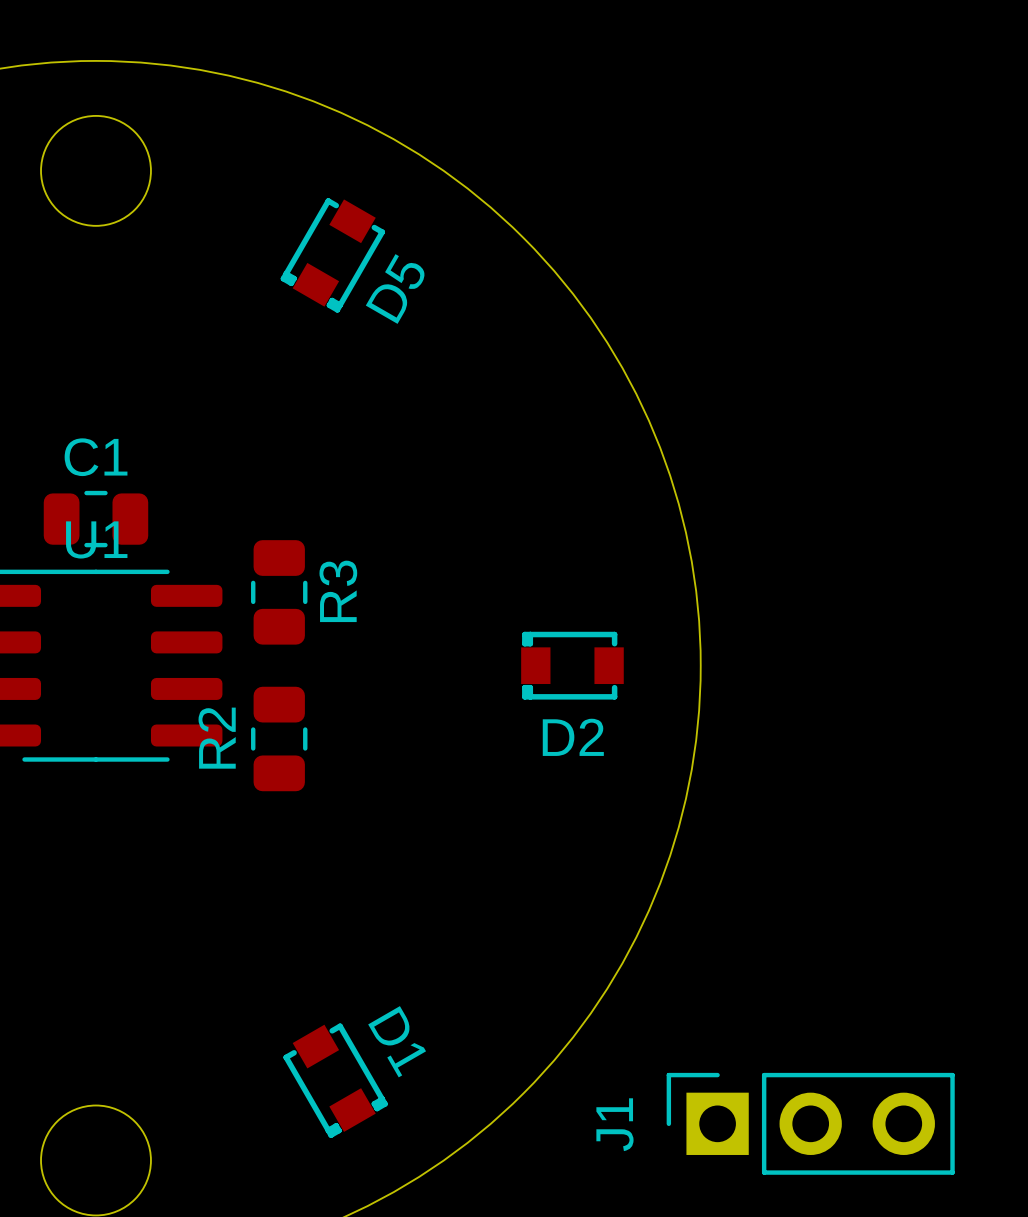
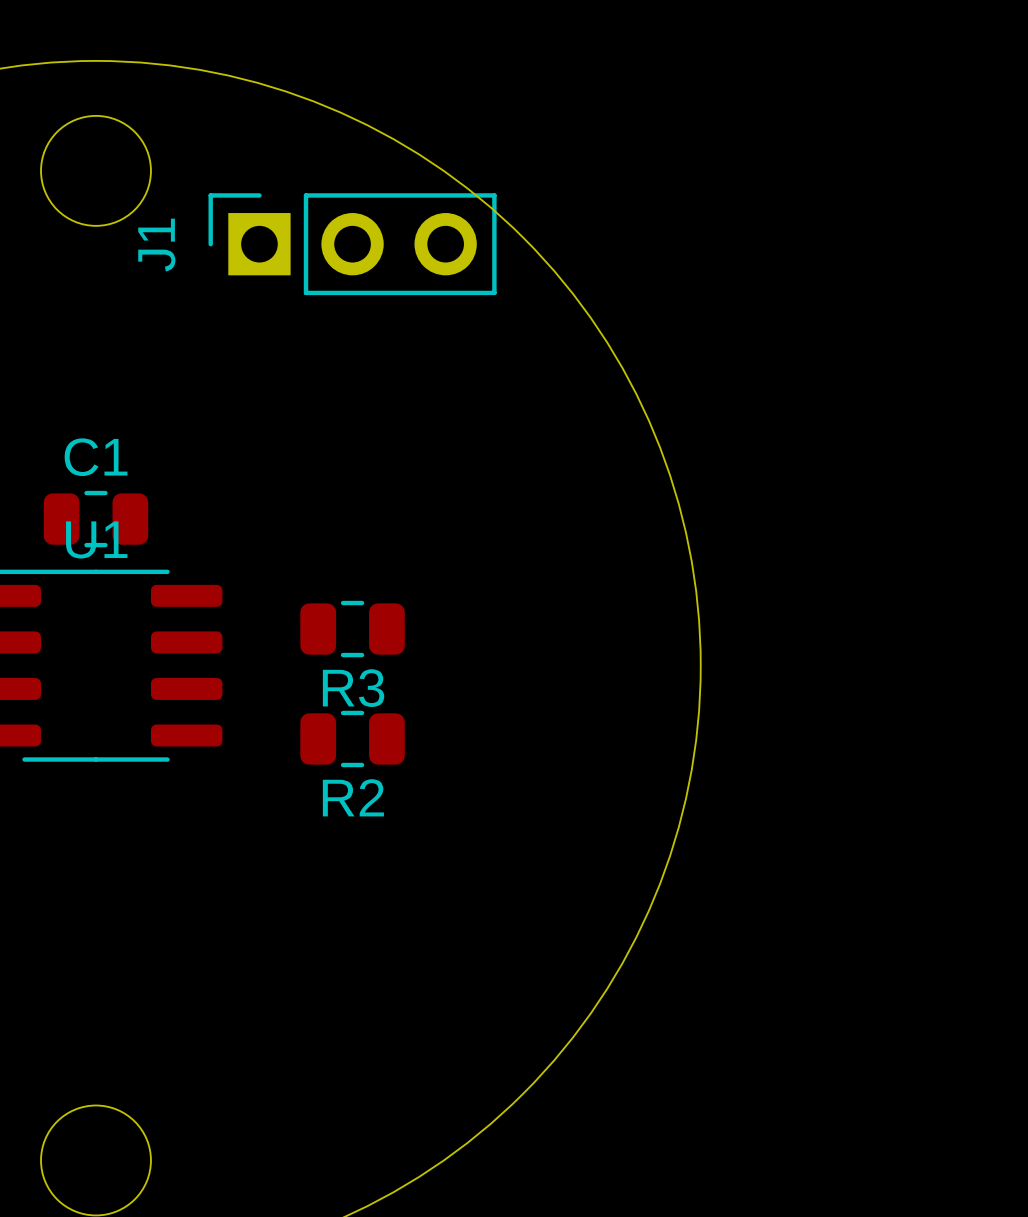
D5: (332, 255) -> none
R3 rotation: 0° (279, 592) -> 90° clockwise (352, 629)
R3 position: (279, 592) -> (352, 629)
D2: (572, 665) -> none
R2 name position: R2 (217, 738) -> R2 (353, 797)
R2 rotation: 0° (279, 738) -> 90° clockwise (352, 738)
R2 position: (279, 738) -> (352, 738)
D1: (335, 1080) -> none
J1 position: (810, 1123) -> (352, 244)

